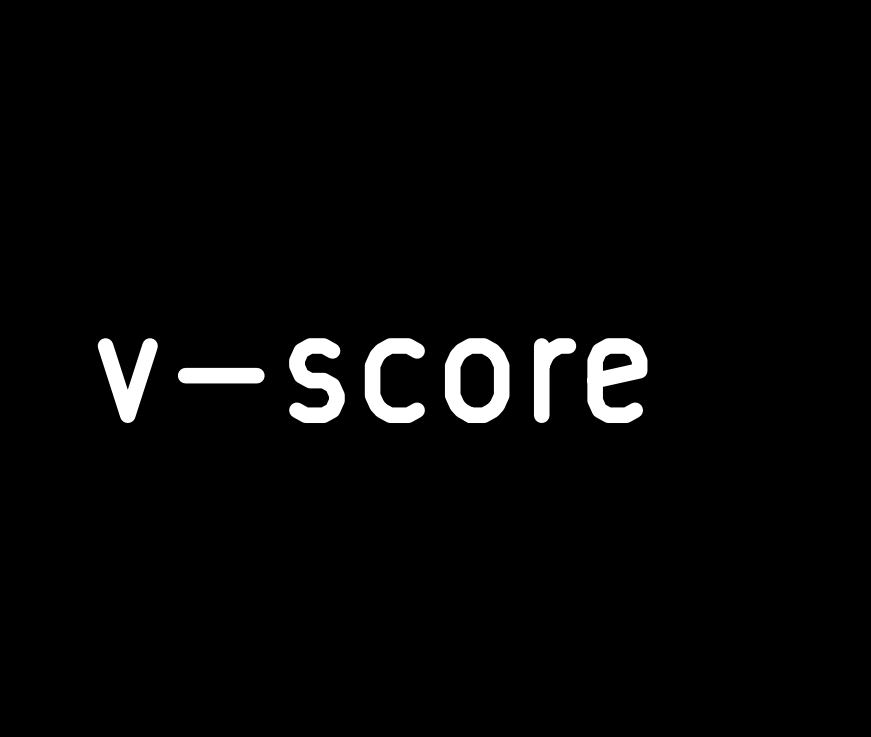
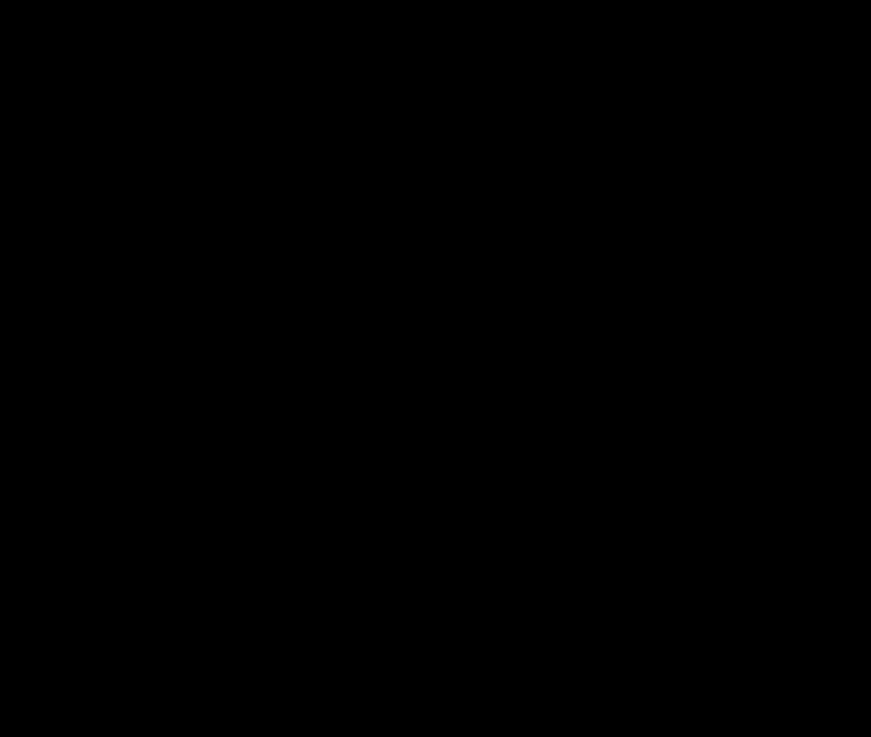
text: v-score (372, 380) -> none

